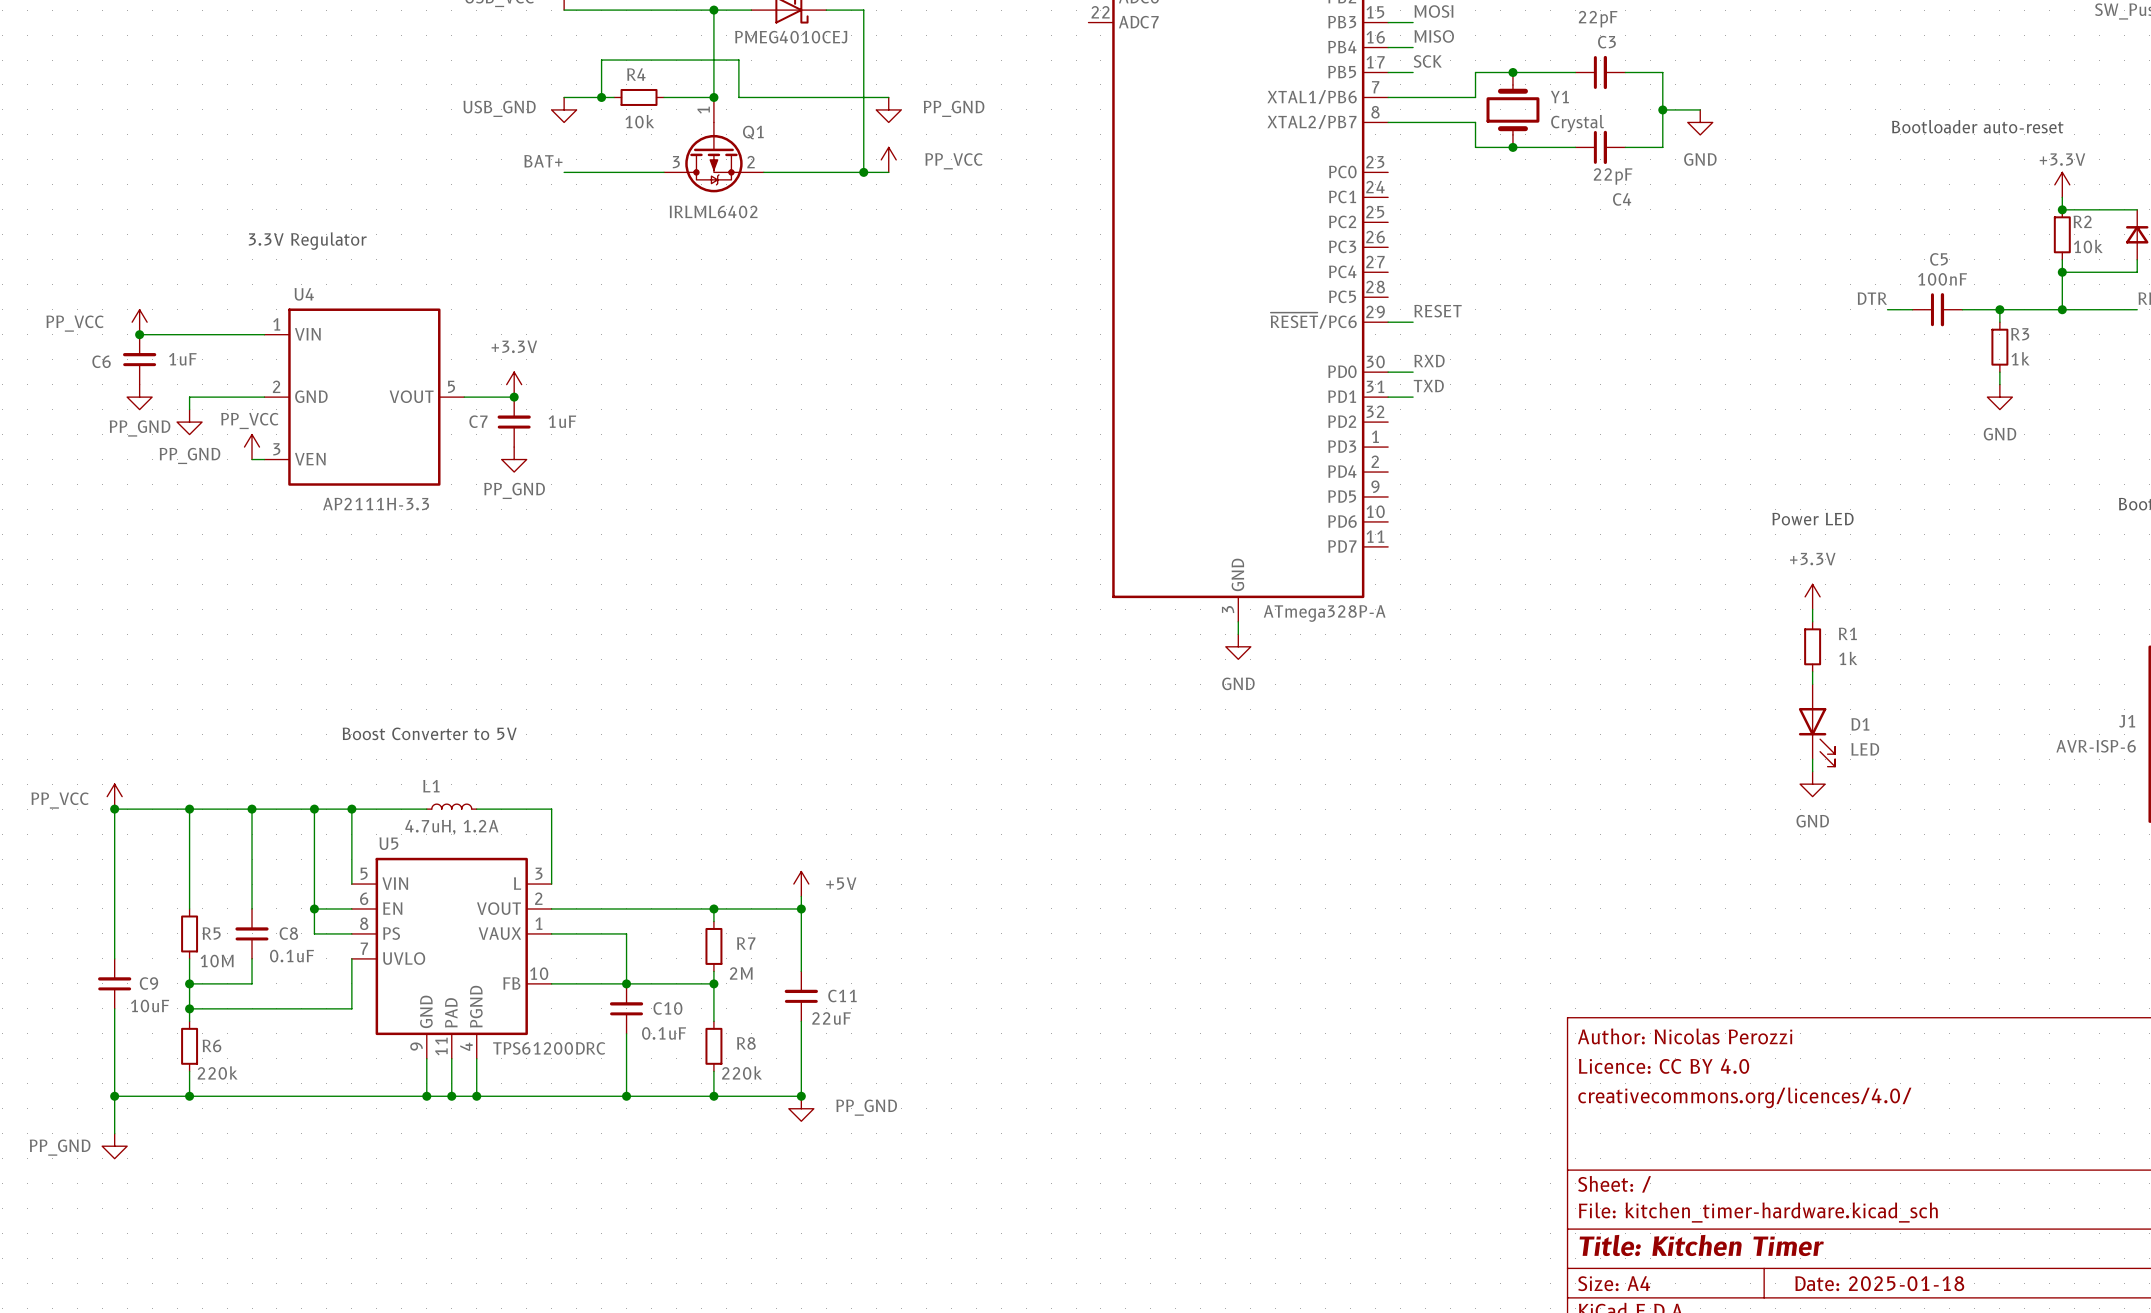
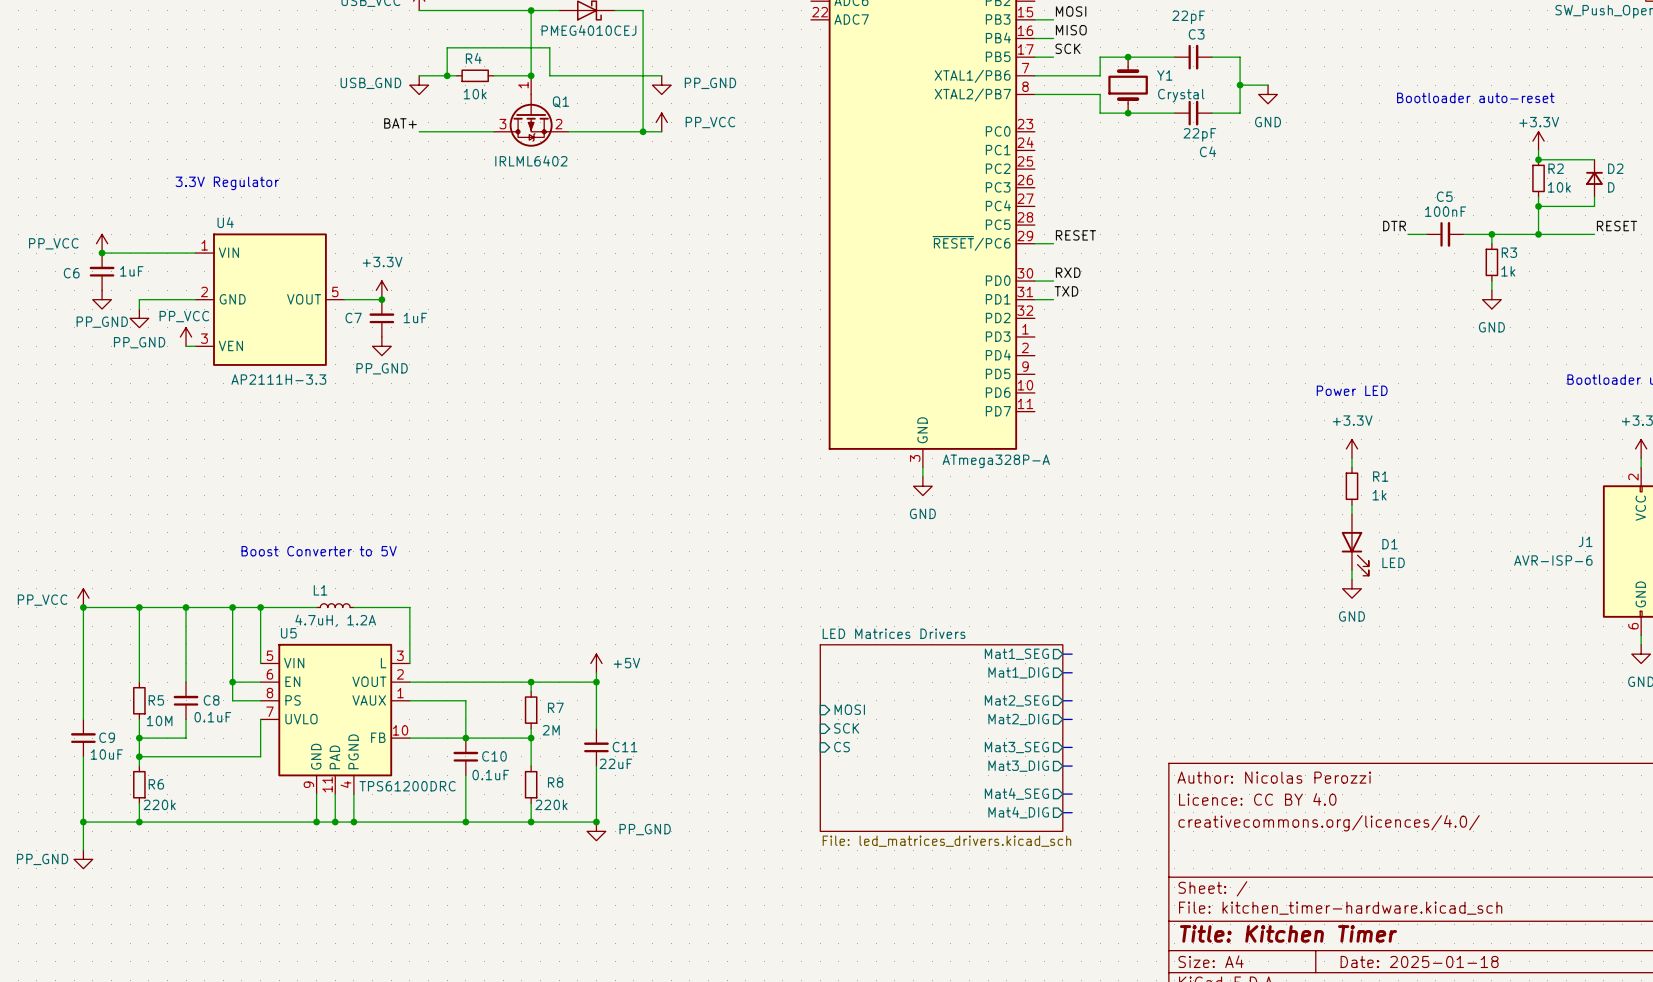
bus: none -> (1062, 654) (1072, 654)
sheet pin: none -> Mat1_SEG (1016, 654)
bus: none -> (1062, 672) (1072, 672)
sheet pin: none -> Mat1_DIG (1018, 672)
bus: none -> (1062, 700) (1072, 700)
sheet pin: none -> Mat2_SEG (1016, 700)
sheet pin: none -> MOSI (849, 709)
bus: none -> (1062, 719) (1072, 719)
sheet pin: none -> Mat2_DIG (1018, 719)
sheet pin: none -> SCK (846, 728)
sheet LED Matrices Drivers: none -> File: led_matrices_drivers.kicad_sch (941, 738)
sheet pin: none -> CS (841, 747)
bus: none -> (1062, 747) (1072, 747)
sheet pin: none -> Mat3_SEG (1016, 747)
bus: none -> (1062, 766) (1072, 766)
sheet pin: none -> Mat3_DIG (1018, 766)
bus: none -> (1062, 794) (1072, 794)
sheet pin: none -> Mat4_SEG (1016, 793)
bus: none -> (1062, 812) (1072, 812)
sheet pin: none -> Mat4_DIG (1018, 812)

